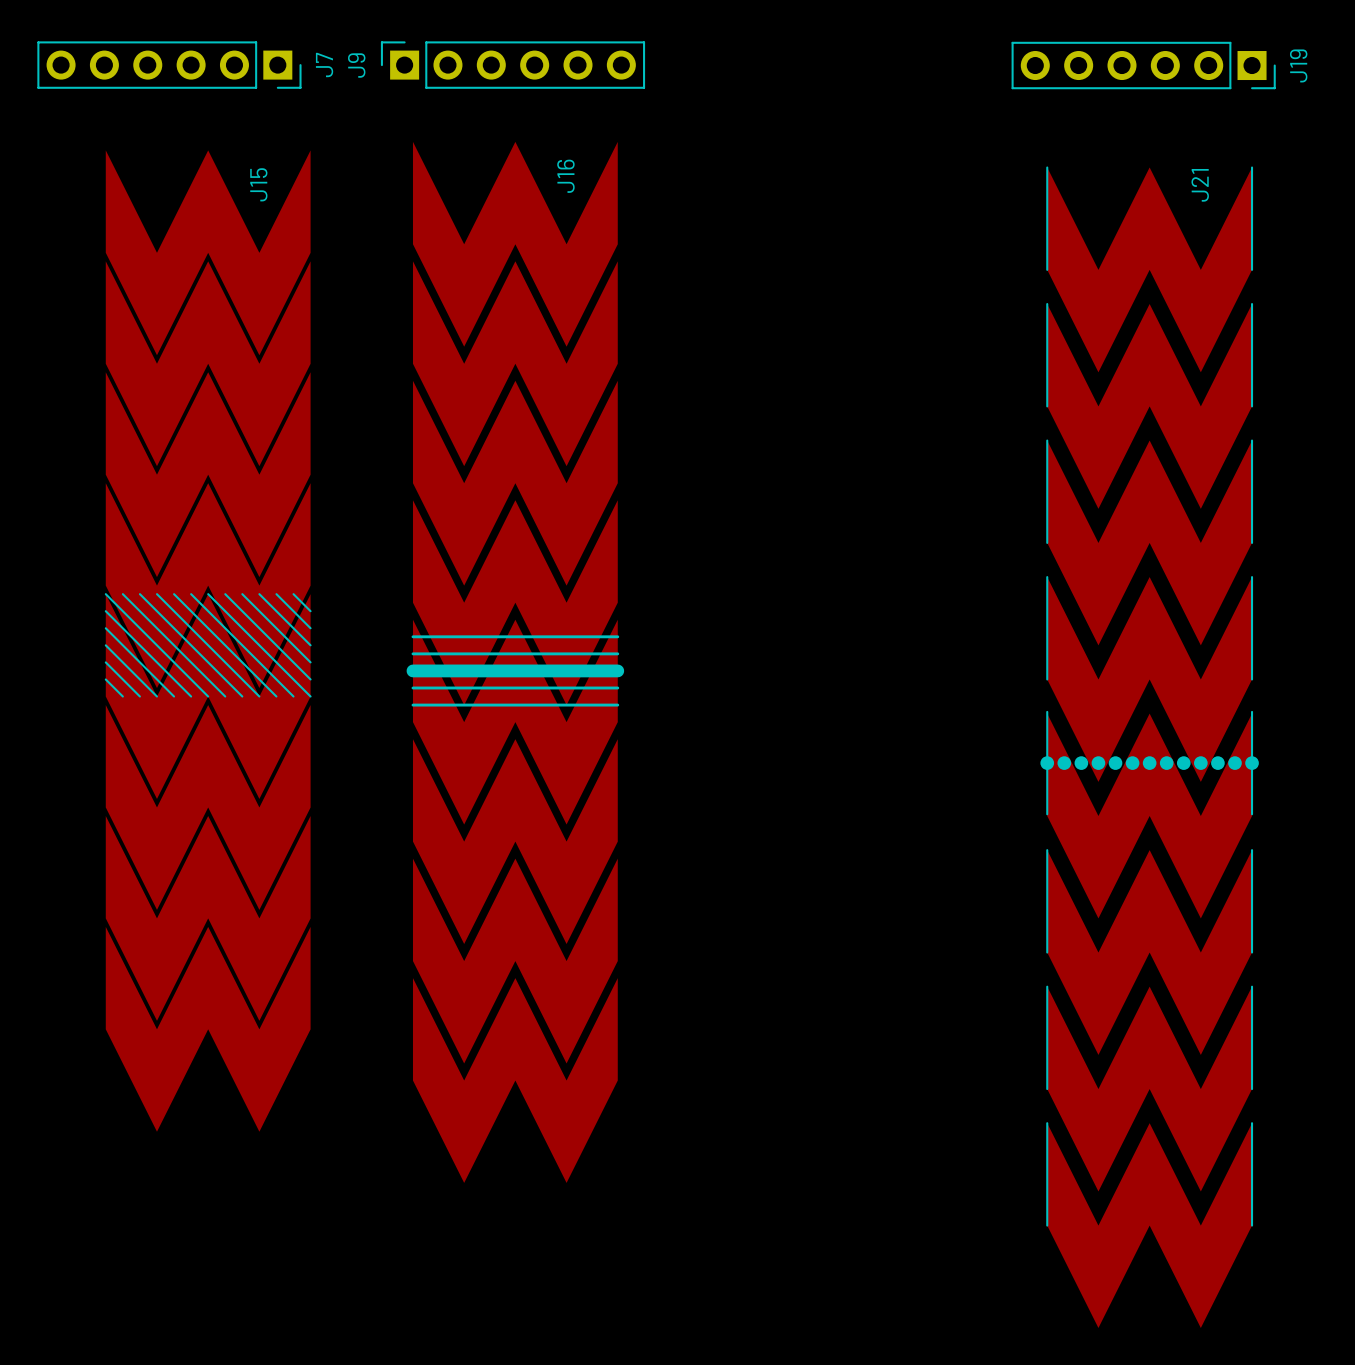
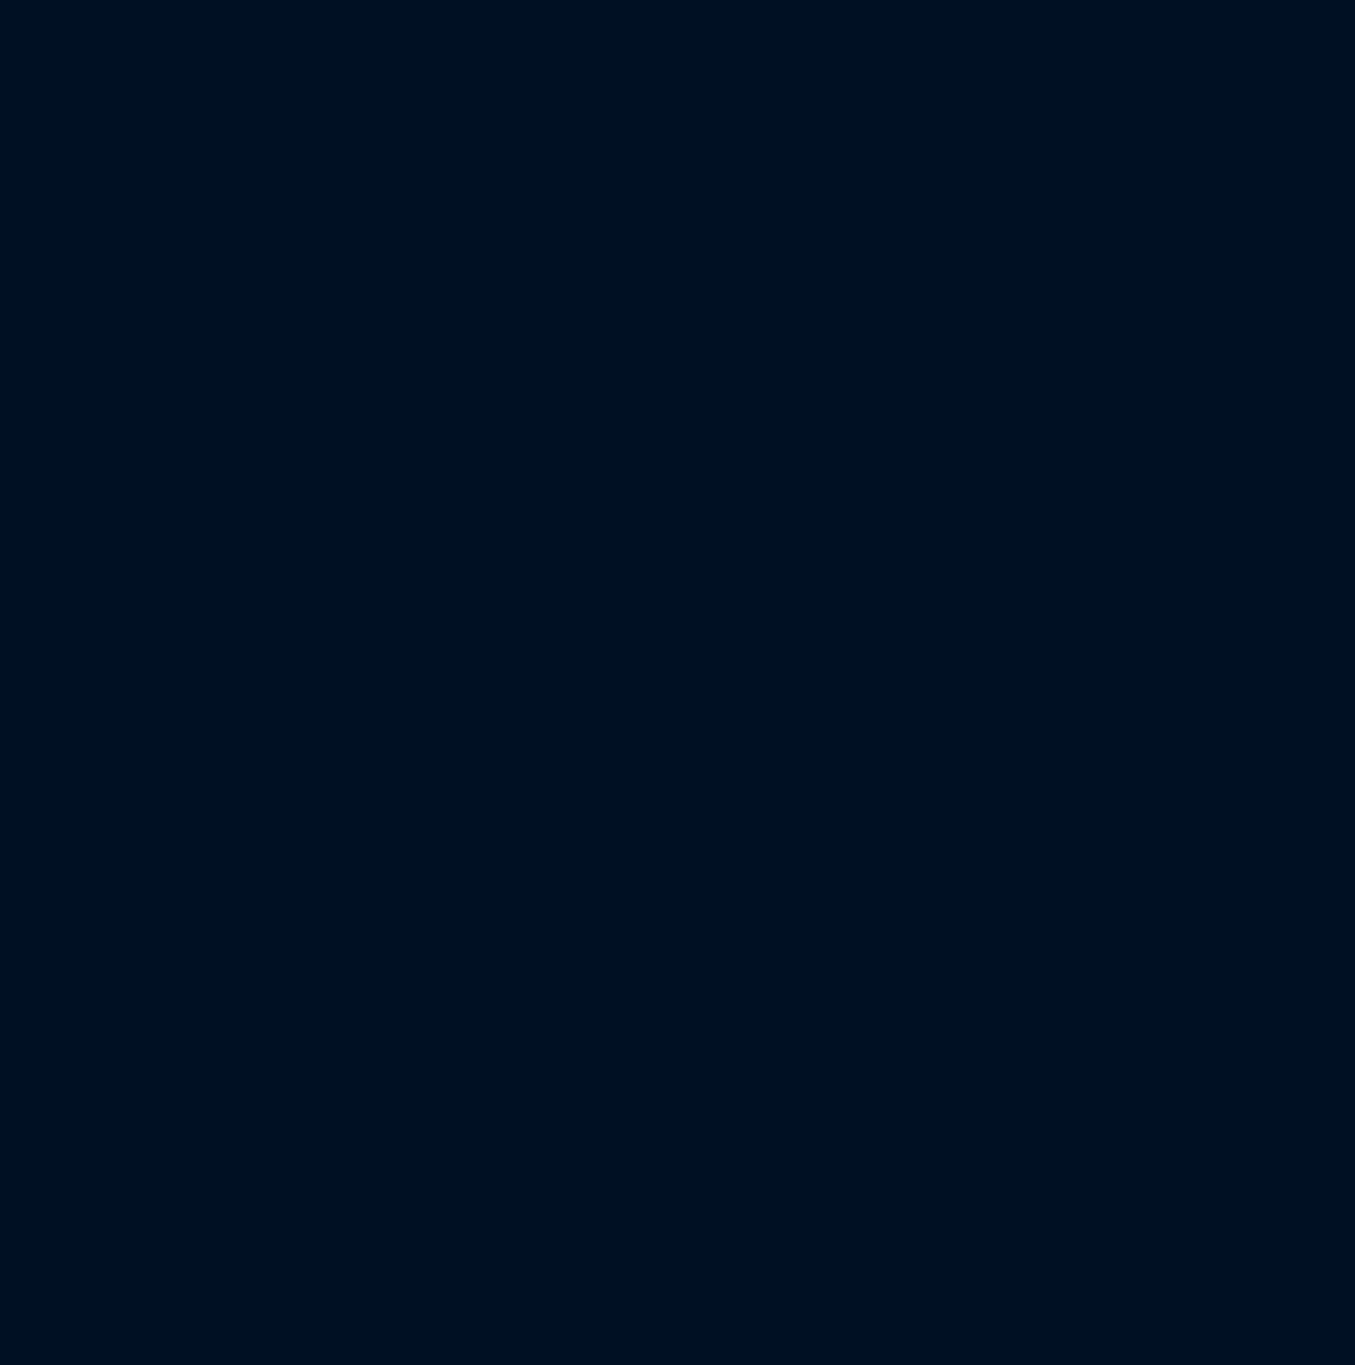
J7: (169, 65) -> none
J9: (512, 65) -> none
J19: (1143, 65) -> none
J15: (208, 641) -> none
J16: (515, 662) -> none
J21: (1149, 747) -> none

